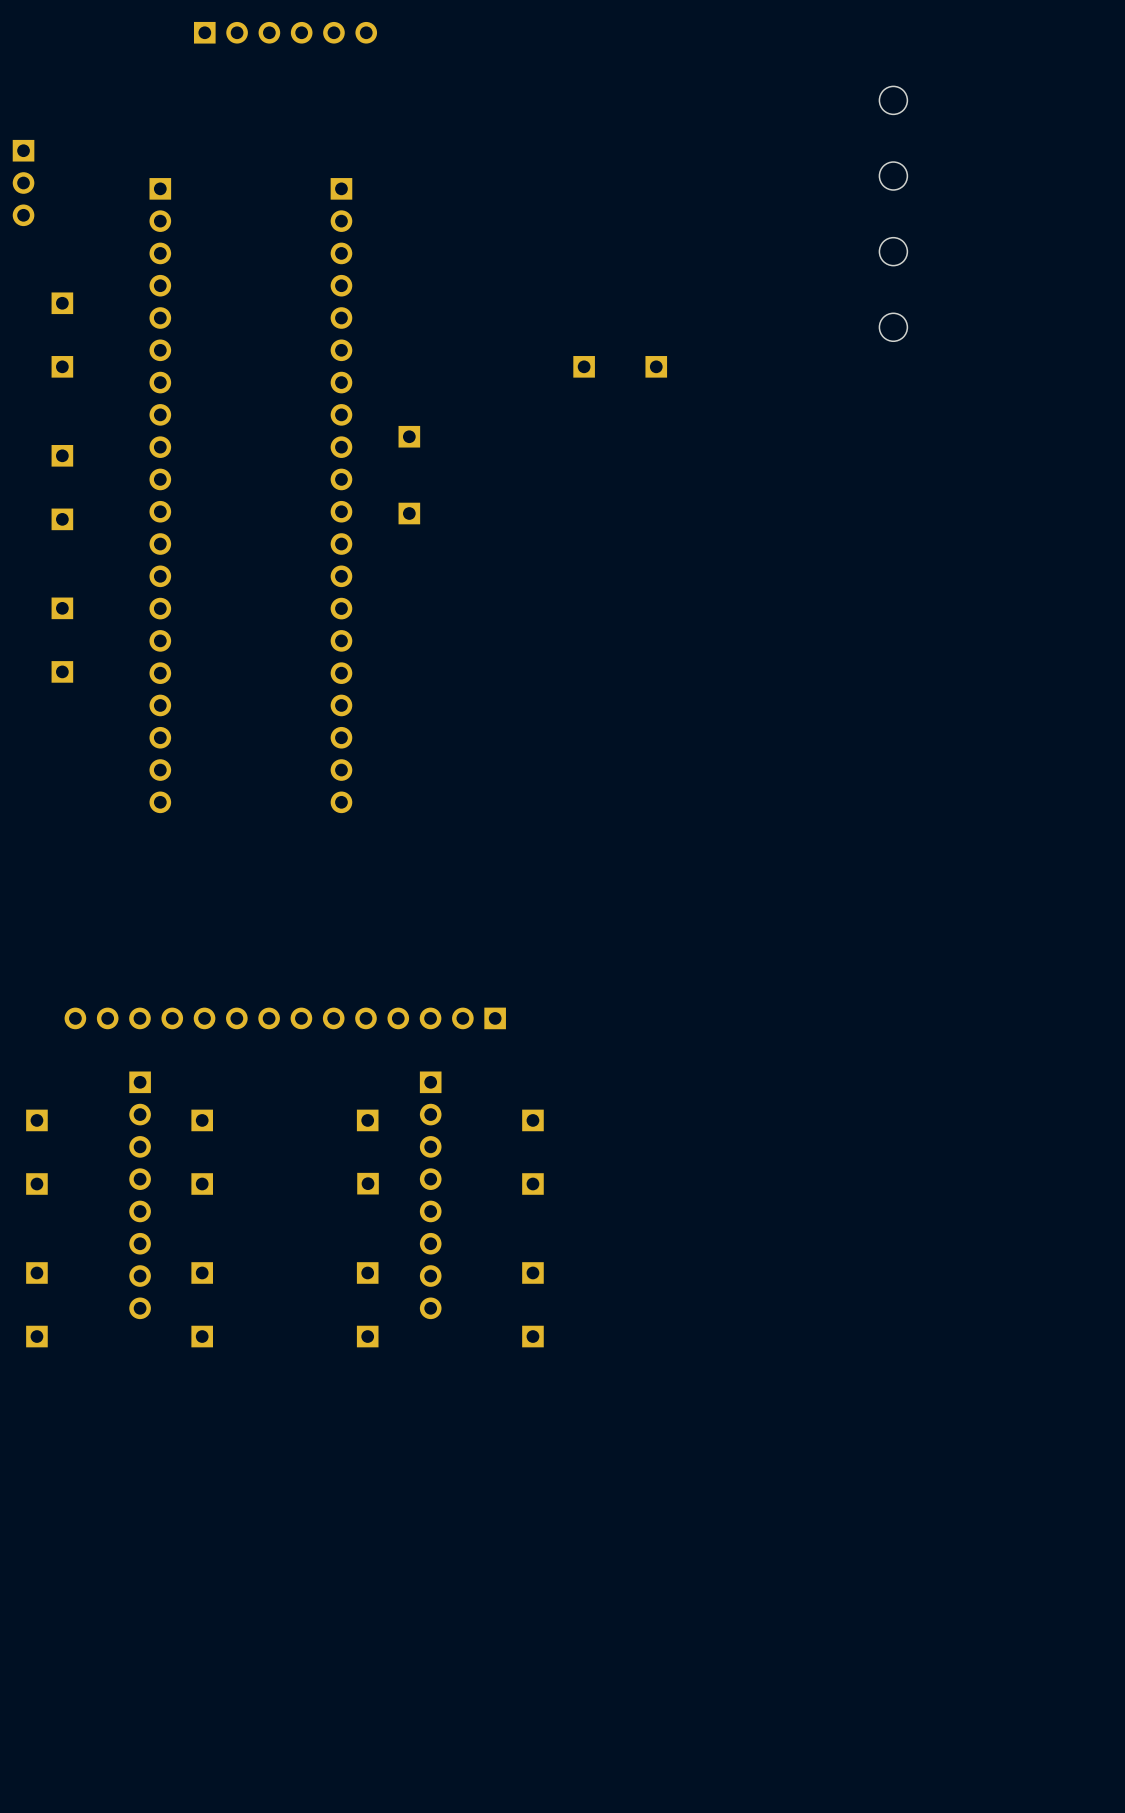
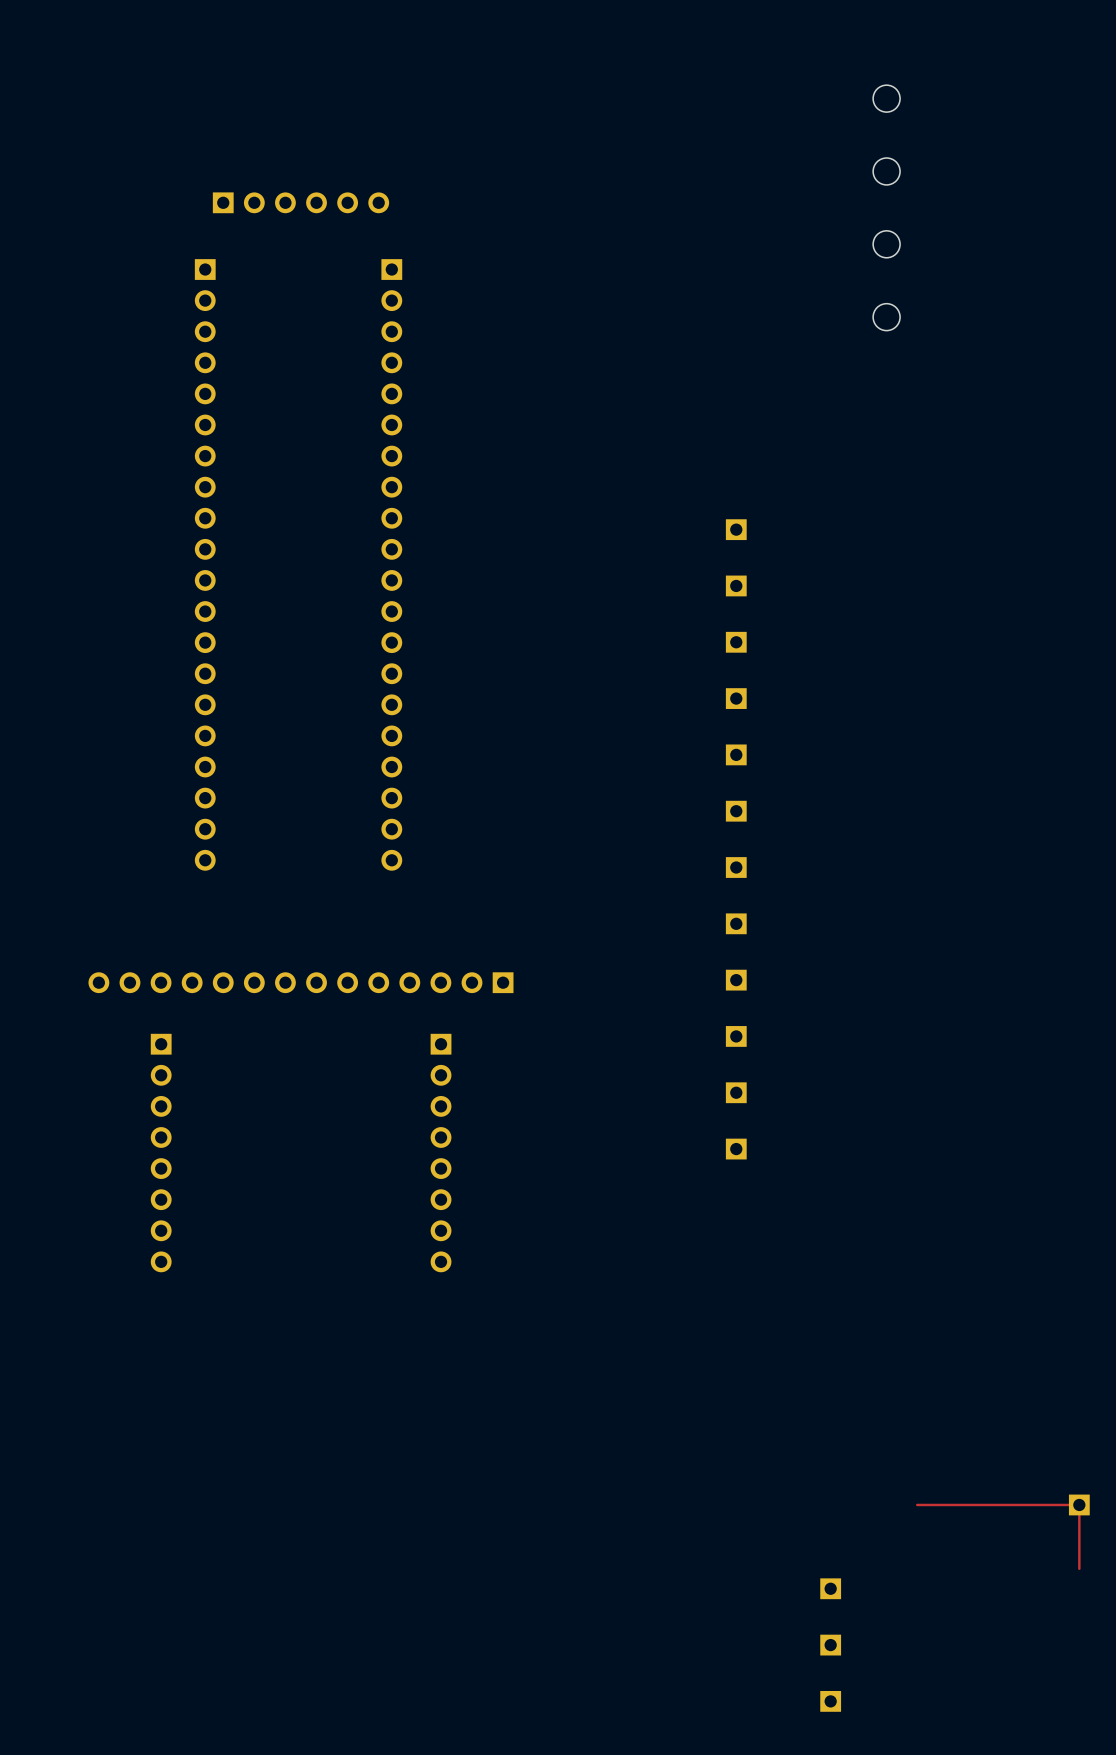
part position: (285, 32) -> (300, 202)
part: (23, 183) -> none
part: (62, 303) -> none
part: (62, 366) -> none
part: (584, 366) -> none
part: (656, 366) -> none
part: (409, 436) -> none
part: (62, 455) -> none
part: (160, 495) -> none
part: (341, 495) -> none
part: (409, 513) -> none
part: (62, 519) -> none
part: none -> (736, 529)
part: none -> (205, 564)
part: none -> (391, 564)
part: none -> (736, 585)
part: (62, 608) -> none
part: none -> (736, 642)
part: (62, 671) -> none
part: none -> (736, 698)
part: none -> (736, 754)
part: none -> (736, 811)
part: none -> (736, 867)
part: none -> (736, 923)
part: none -> (736, 980)
part: none -> (736, 1036)
part: (36, 1120) -> none
part: (202, 1120) -> none
part: (367, 1120) -> none
part: (532, 1120) -> none
part: none -> (736, 1092)
part: (36, 1183) -> none
part: (202, 1183) -> none
part: (368, 1183) -> none
part: (532, 1183) -> none
part: none -> (736, 1149)
part: (36, 1272) -> none
part: (202, 1272) -> none
part: (367, 1272) -> none
part: (532, 1272) -> none
part: (36, 1336) -> none
part: (202, 1336) -> none
part: (367, 1336) -> none
part: (532, 1336) -> none
top track: none -> (917, 1504) (1079, 1504) (1079, 1568)
part: none -> (1079, 1504)
part: none -> (830, 1588)
part: none -> (830, 1645)
part: none -> (830, 1701)

